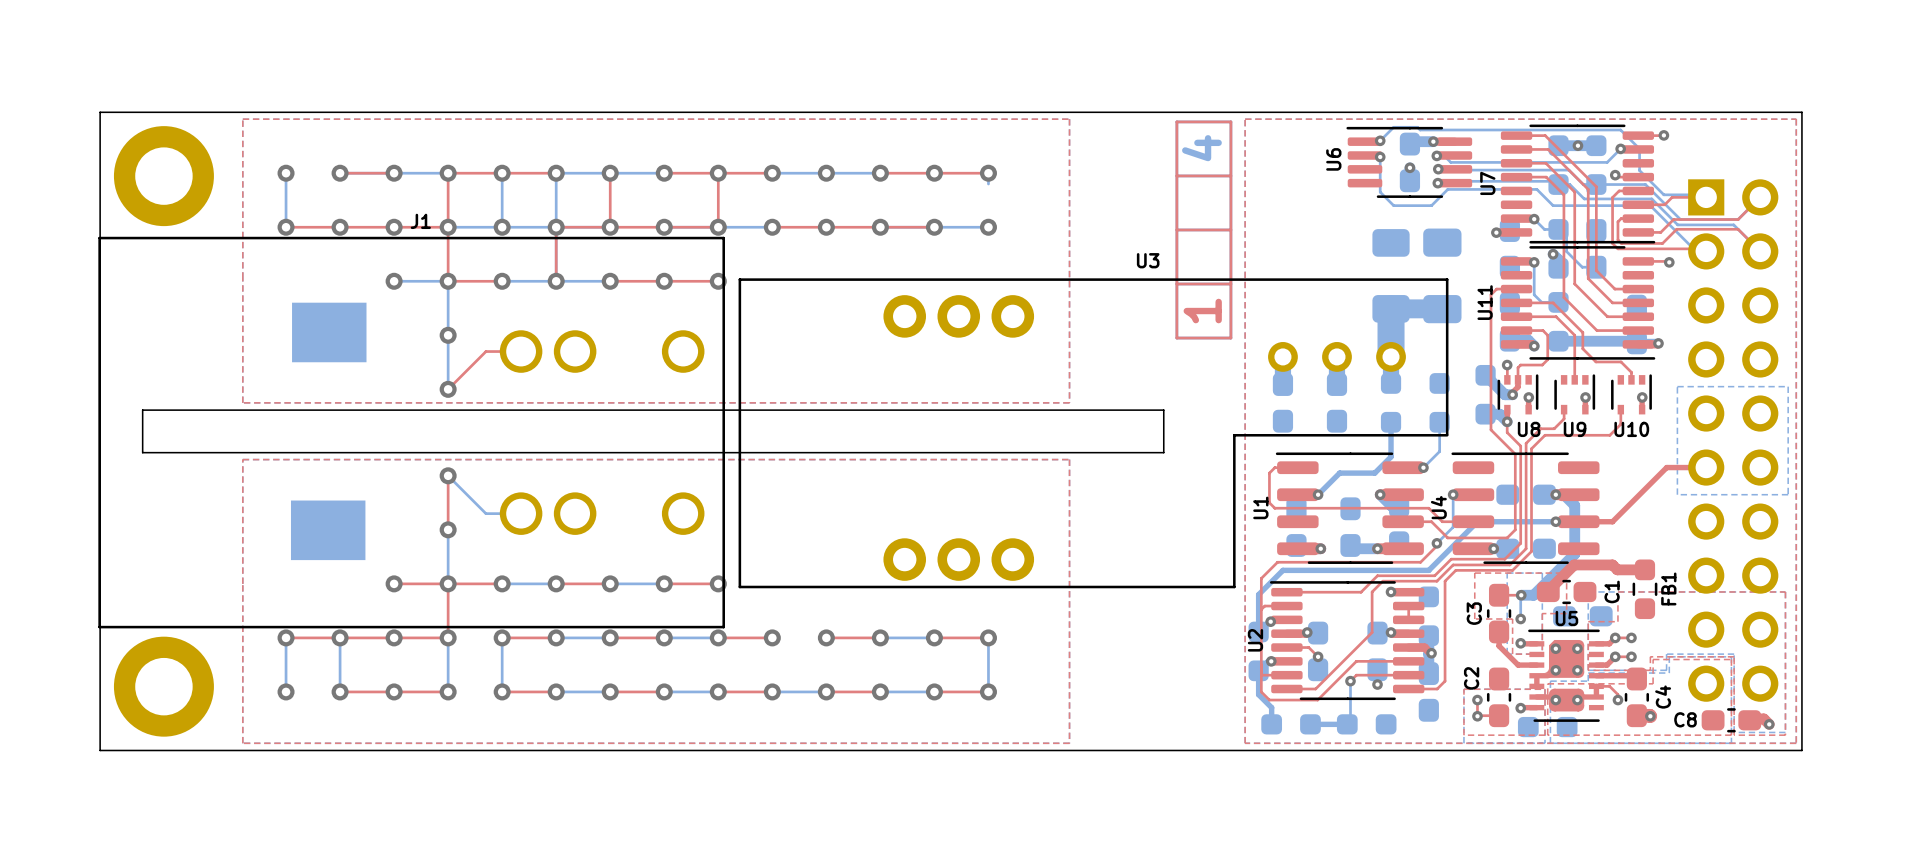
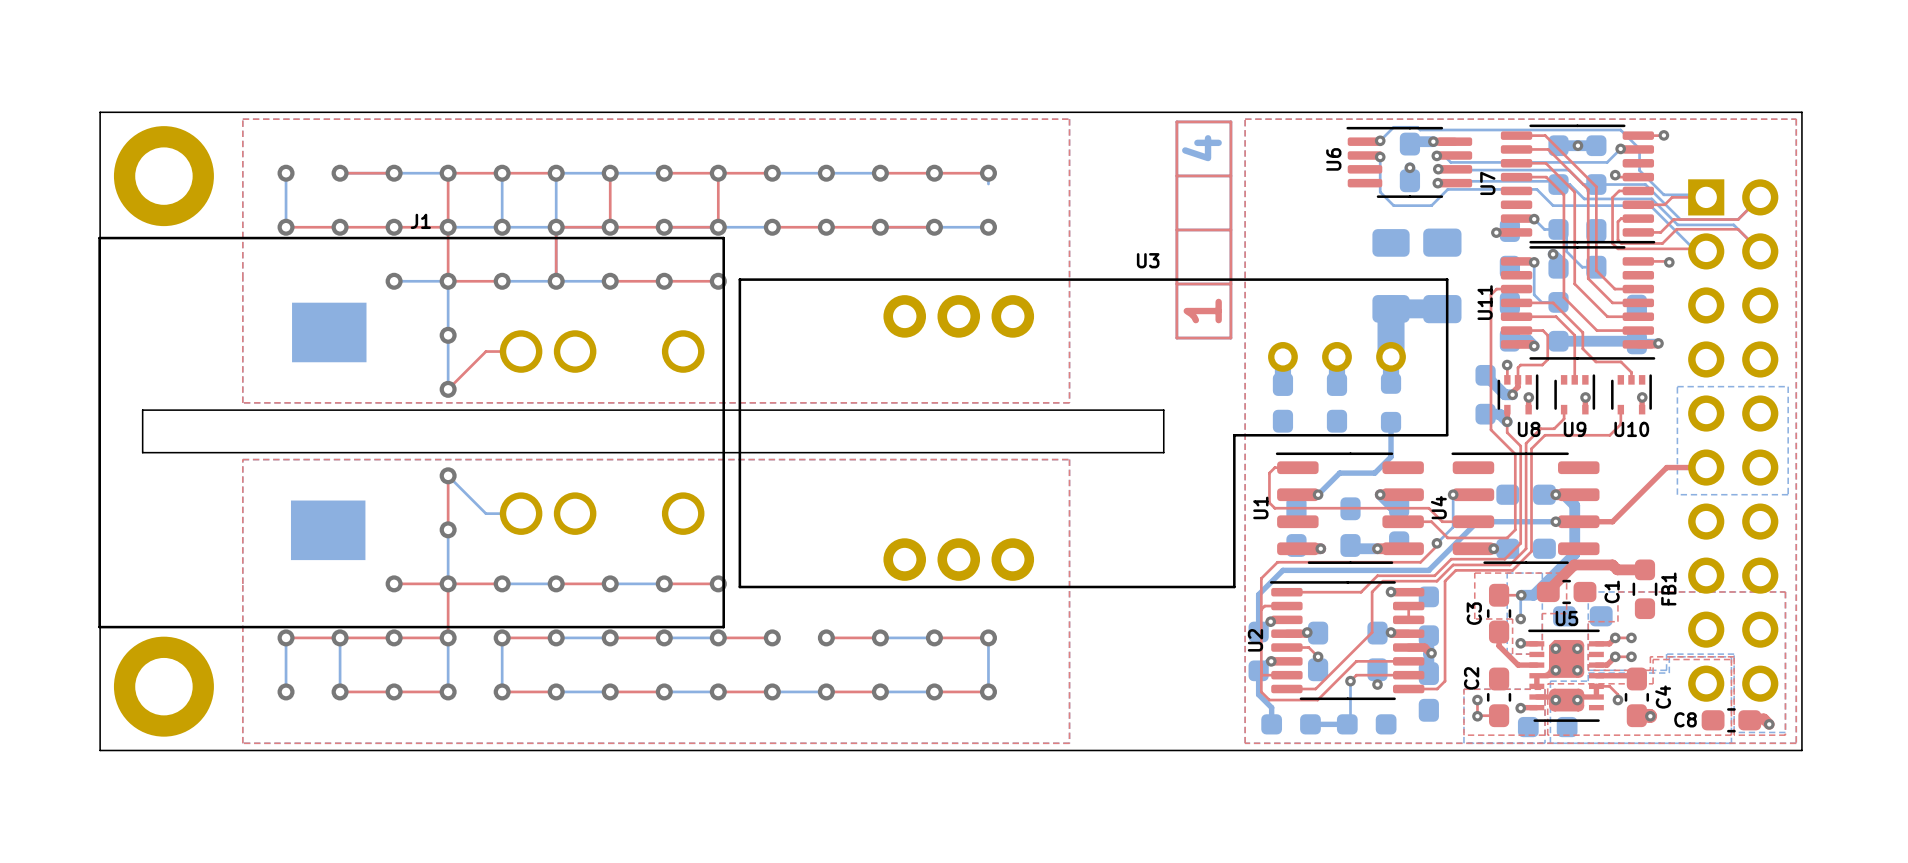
part: (1439, 402) -> none
bottom track: (1439, 422) (1439, 451) (1423, 467) -> none
via: (1423, 467) -> none

